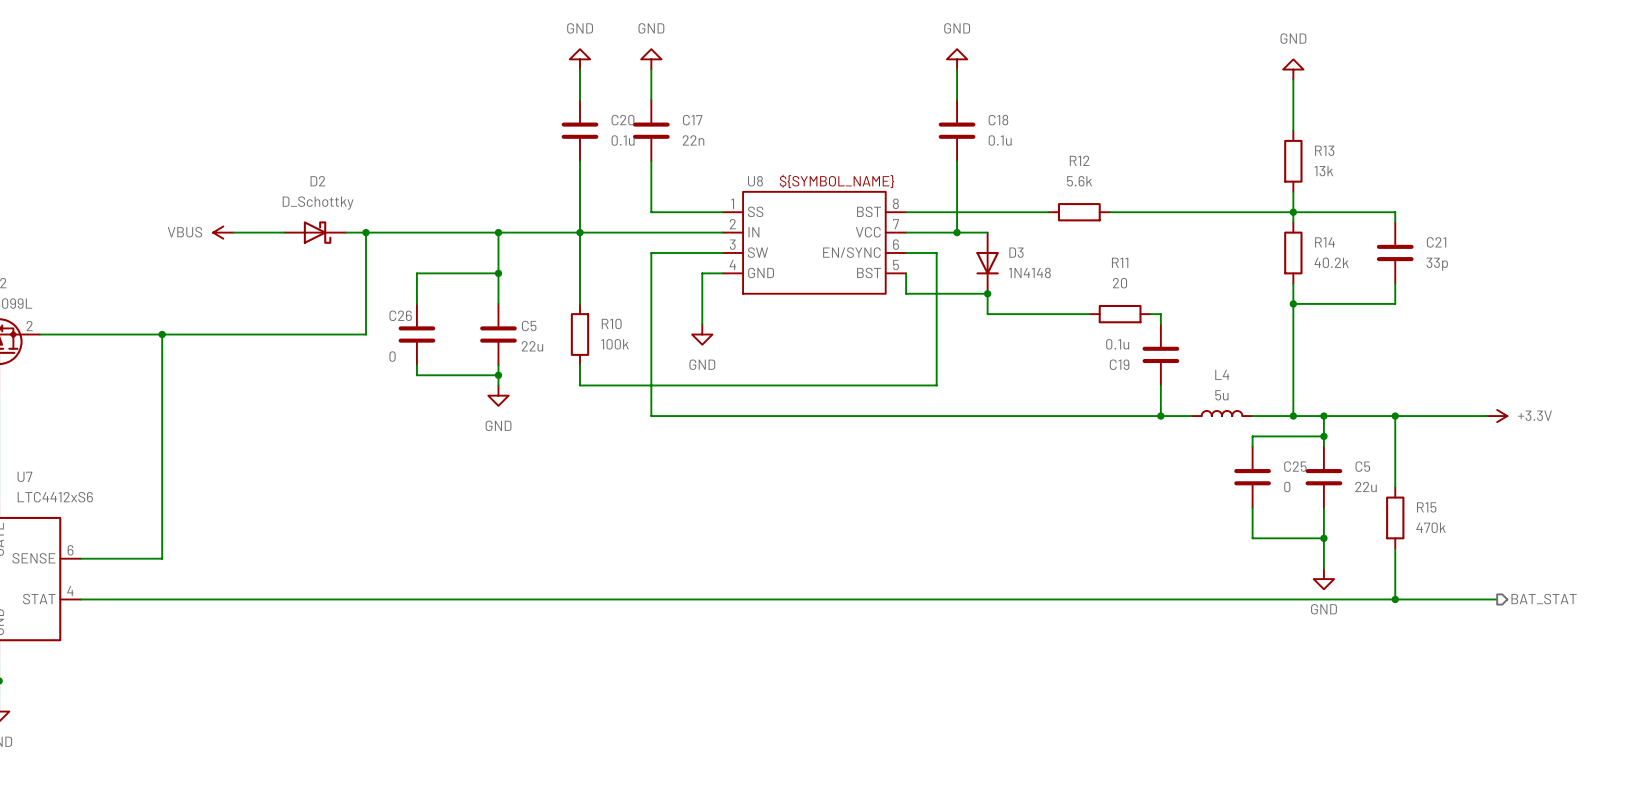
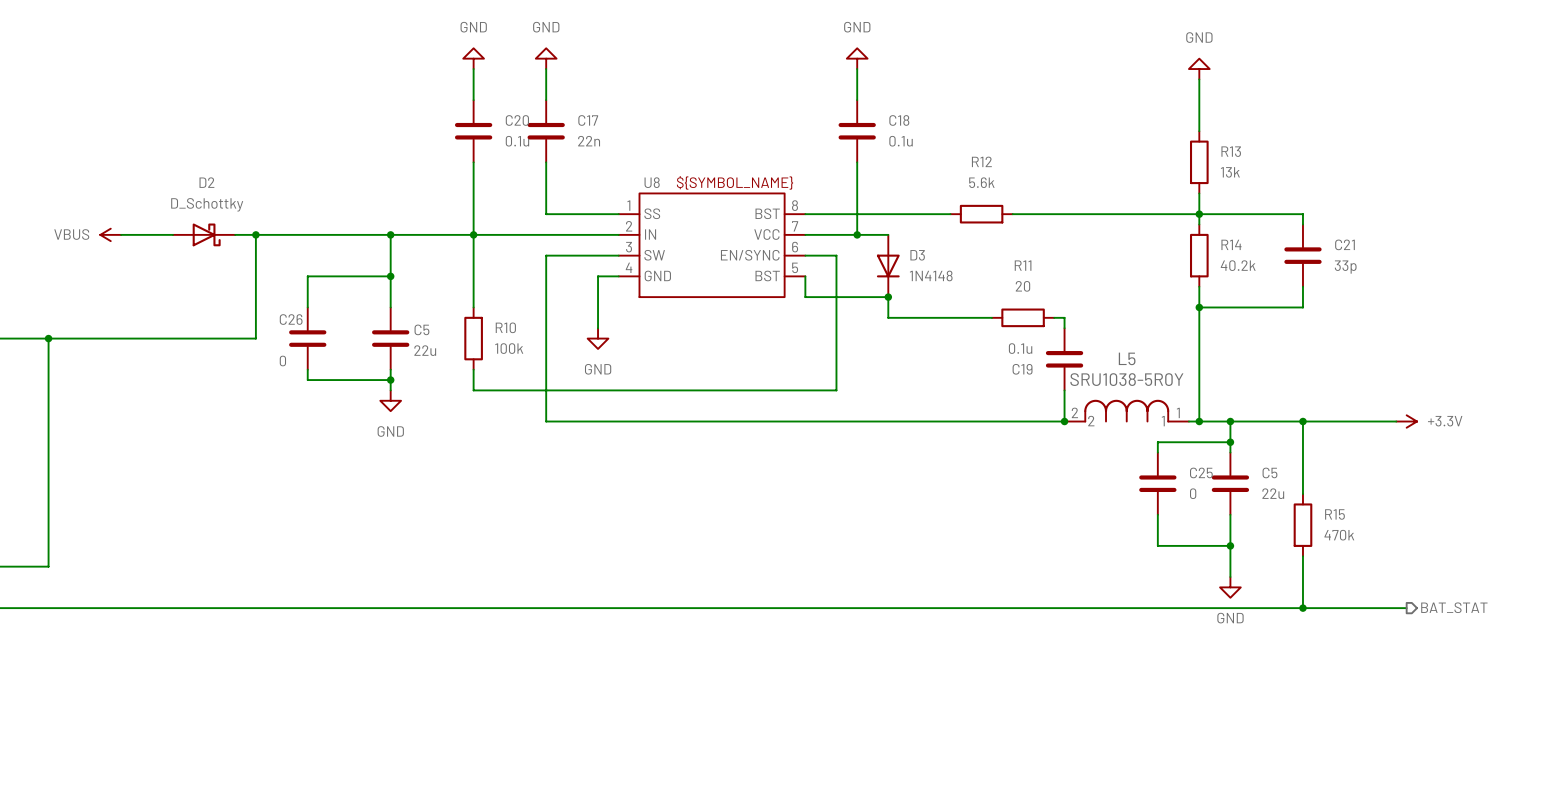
L5: none -> SRU1038-5R0Y (1126, 411)
L4: 5u (1222, 413) -> none

